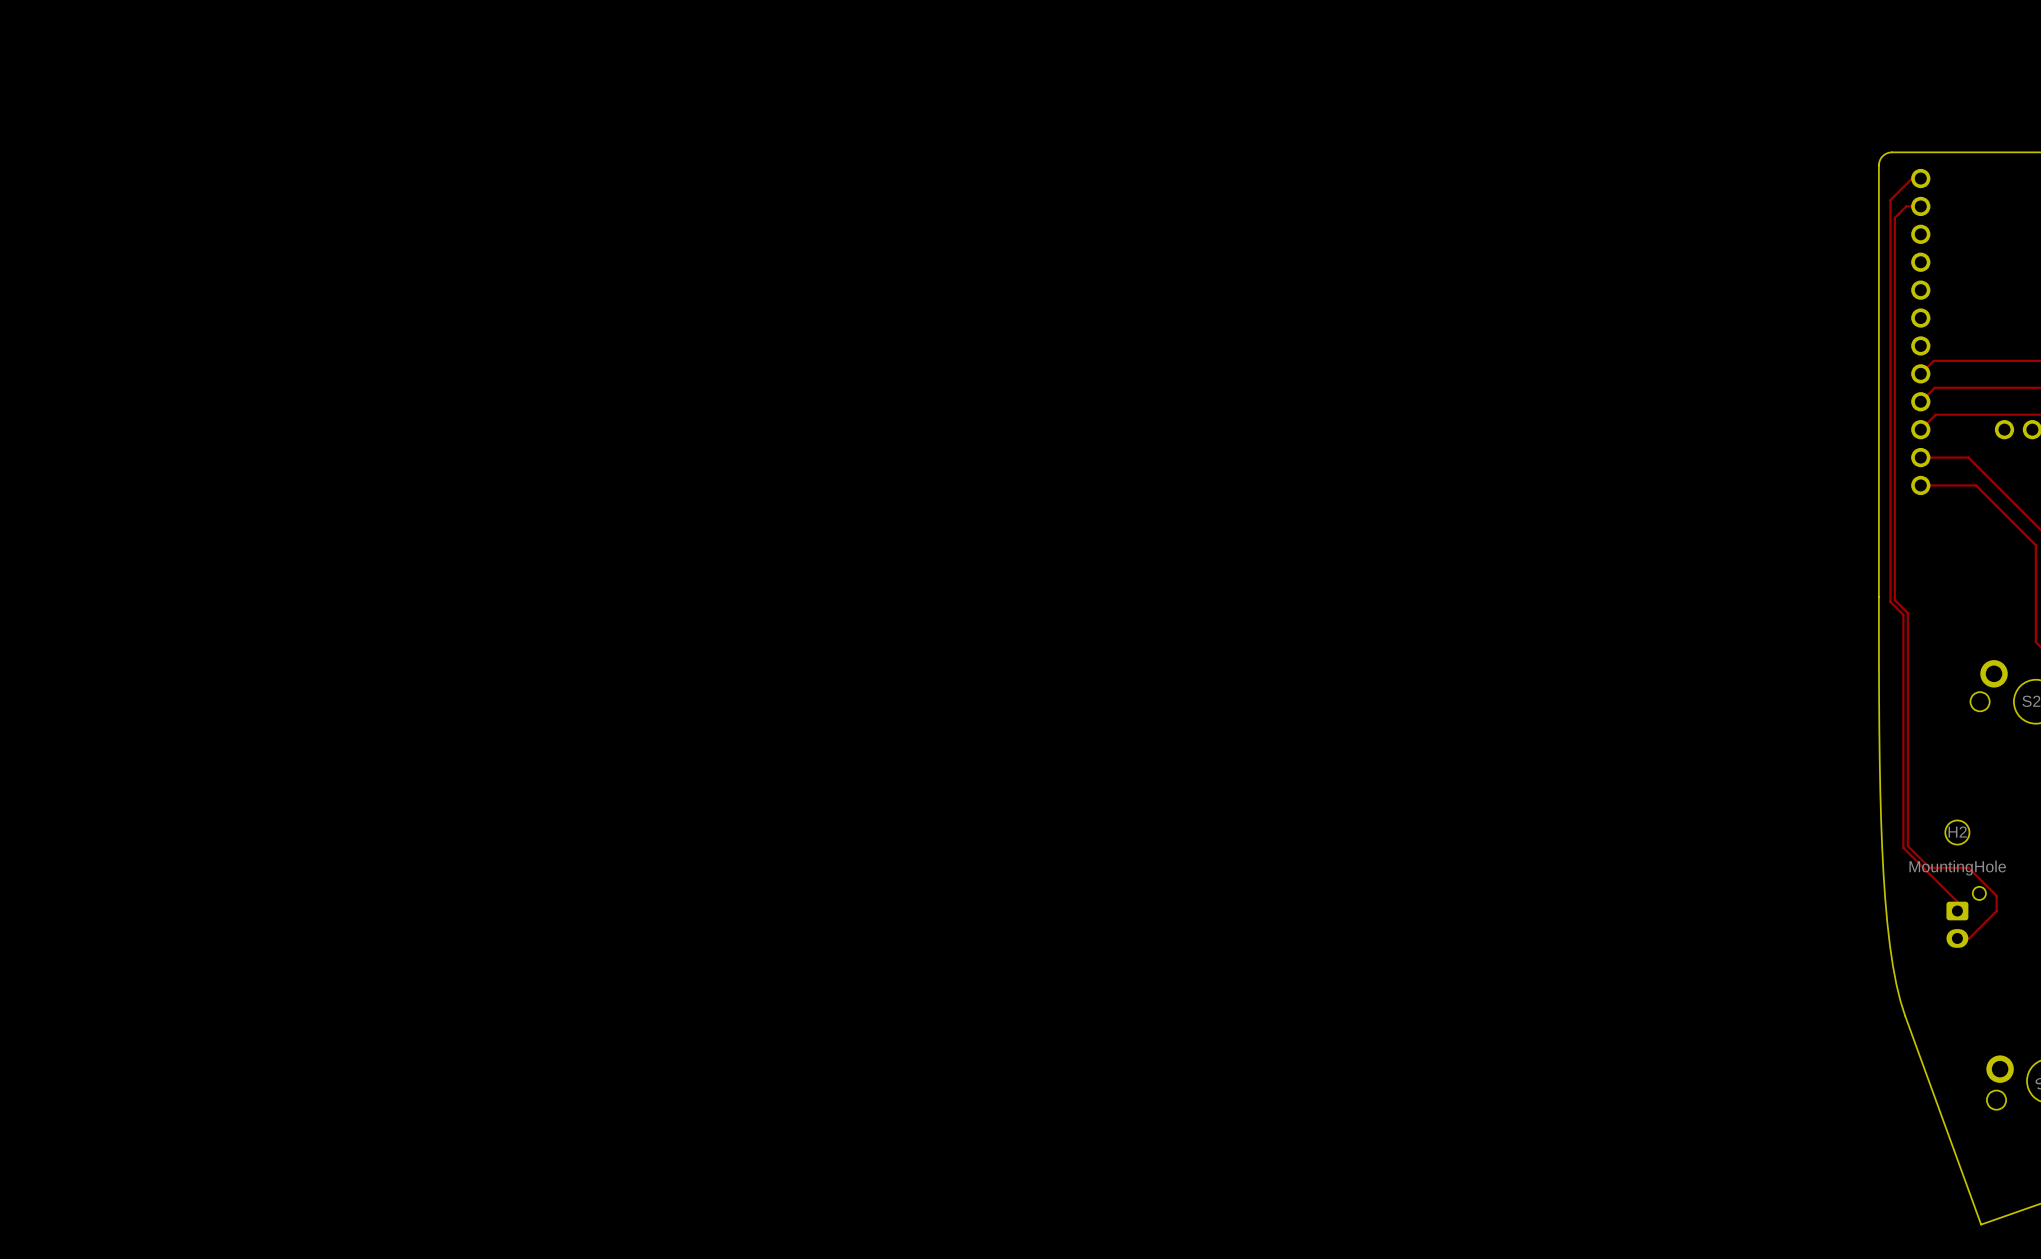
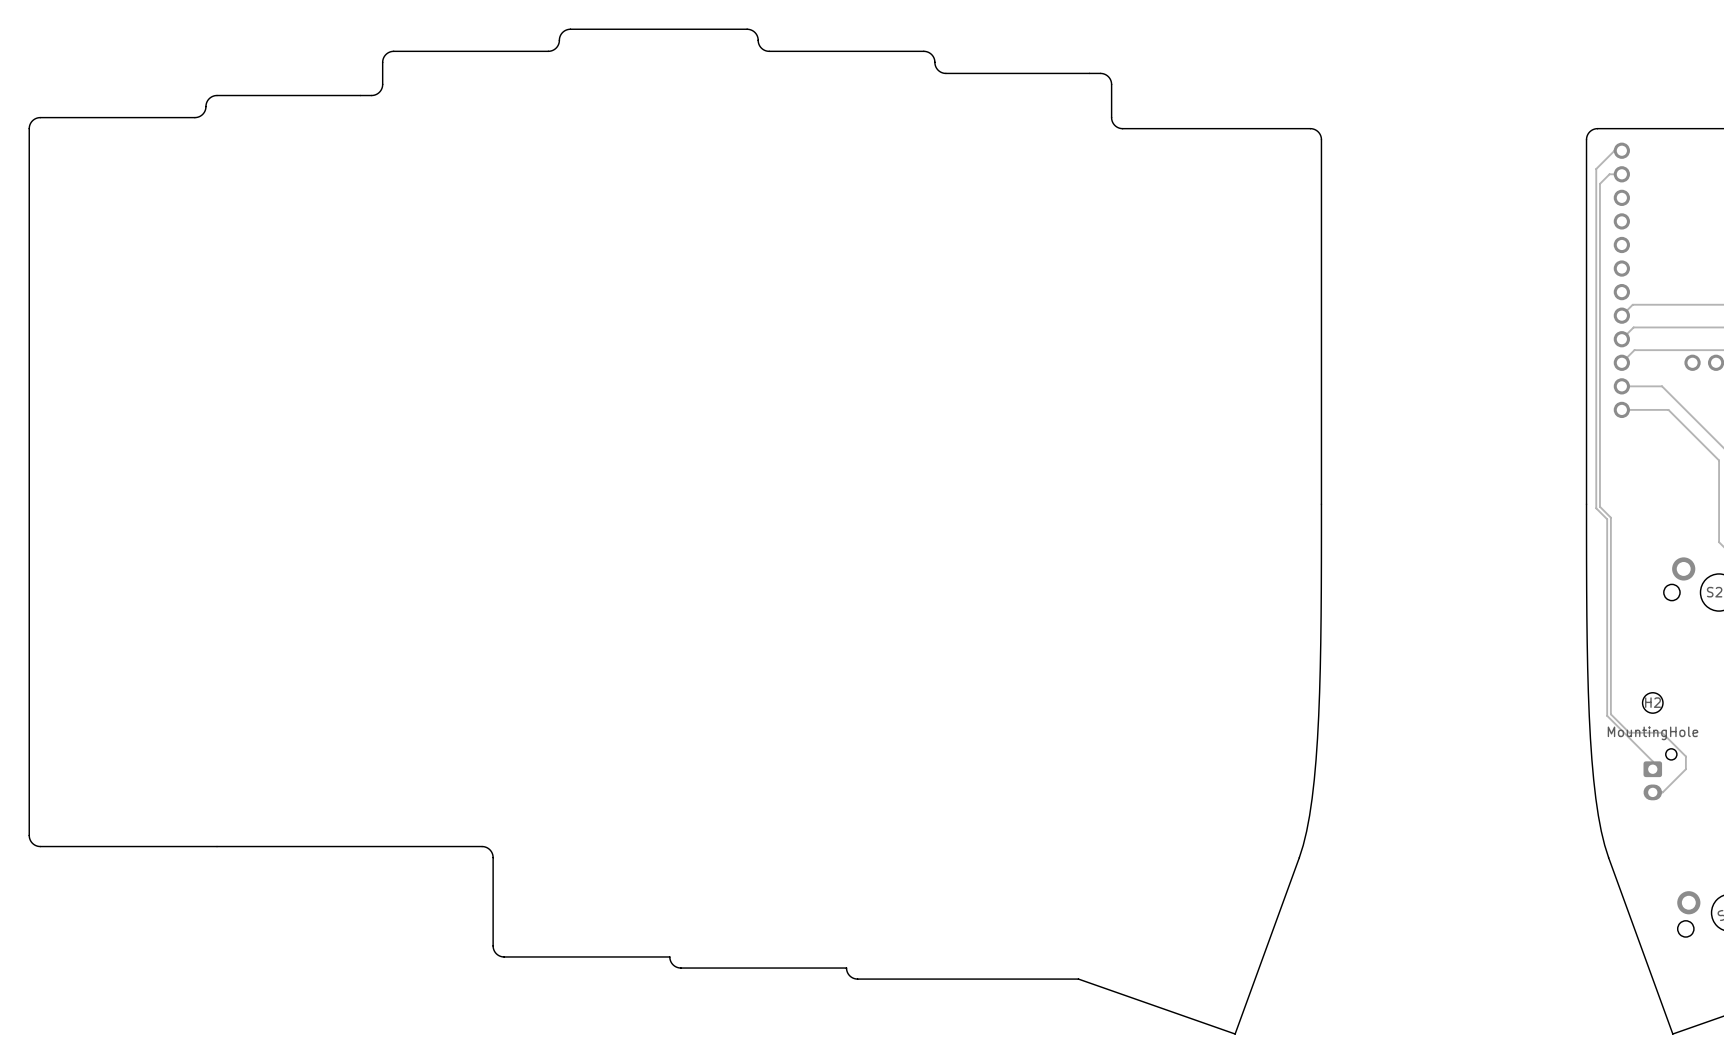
board edge: none -> (934, 62) (938, 70) (944, 73) (1104, 74) (1111, 83) (1111, 120) (1114, 125) (1120, 128) (1310, 128) (1316, 130) (1320, 136) (1321, 616) (1318, 716) (1314, 779) (1303, 845) (1235, 1034) (1078, 979) (857, 979) (849, 975) (846, 968) (680, 968) (673, 964) (669, 956) (501, 956) (496, 953) (493, 947) (493, 856) (489, 849) (483, 846) (40, 846) (31, 842) (29, 835) (29, 128) (33, 119) (40, 117) (196, 117) (203, 113) (208, 99) (215, 95) (372, 95) (378, 93) (382, 88) (382, 59) (390, 51) (549, 51) (557, 47) (562, 32) (570, 29) (748, 29) (755, 33) (759, 46) (766, 51) (925, 51) (931, 54) (934, 62)

